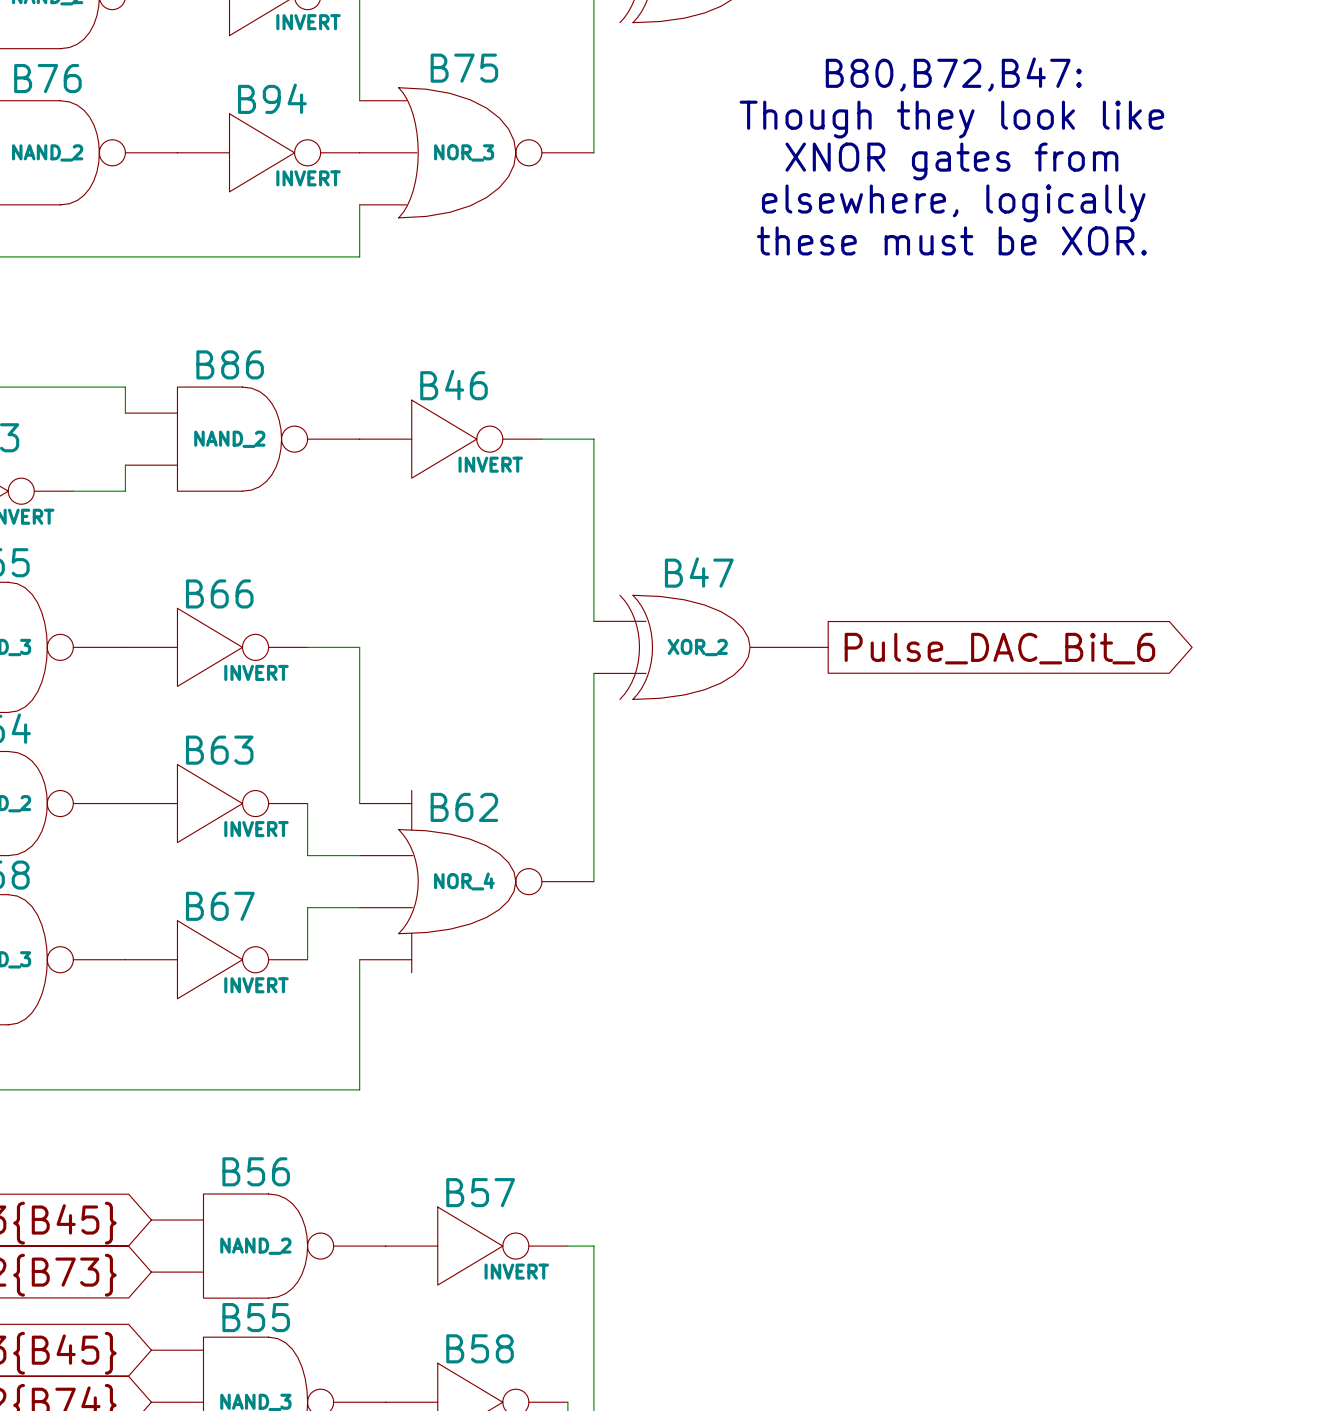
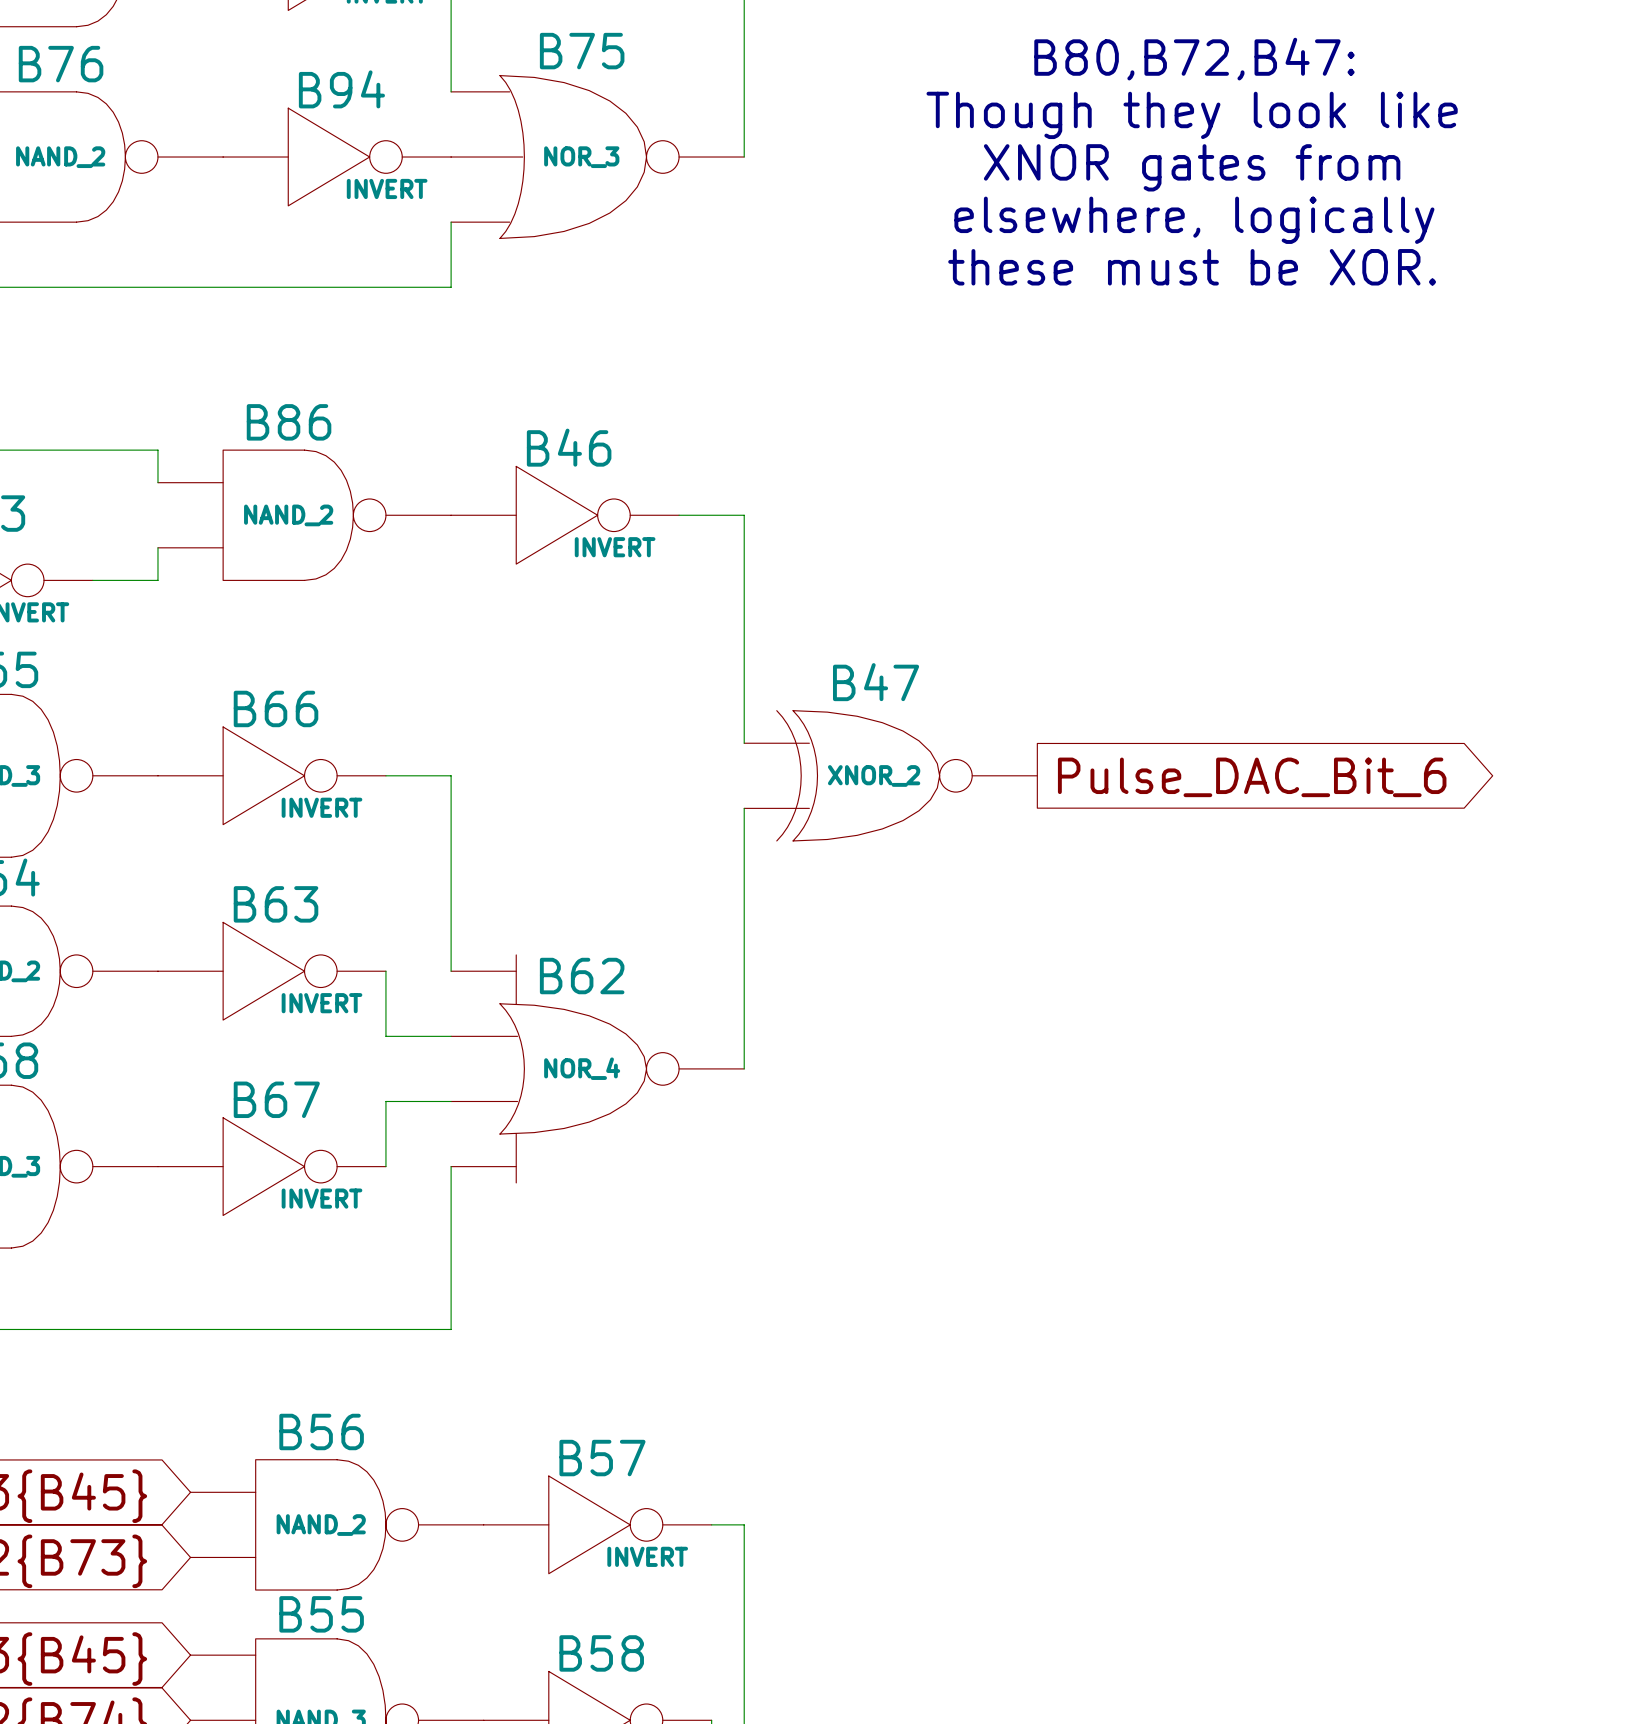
B47 symbol: [593, 595, 829, 700] -> [744, 710, 1038, 841]
B47 value: XOR_2 (697, 647) -> XNOR_2 (874, 775)

